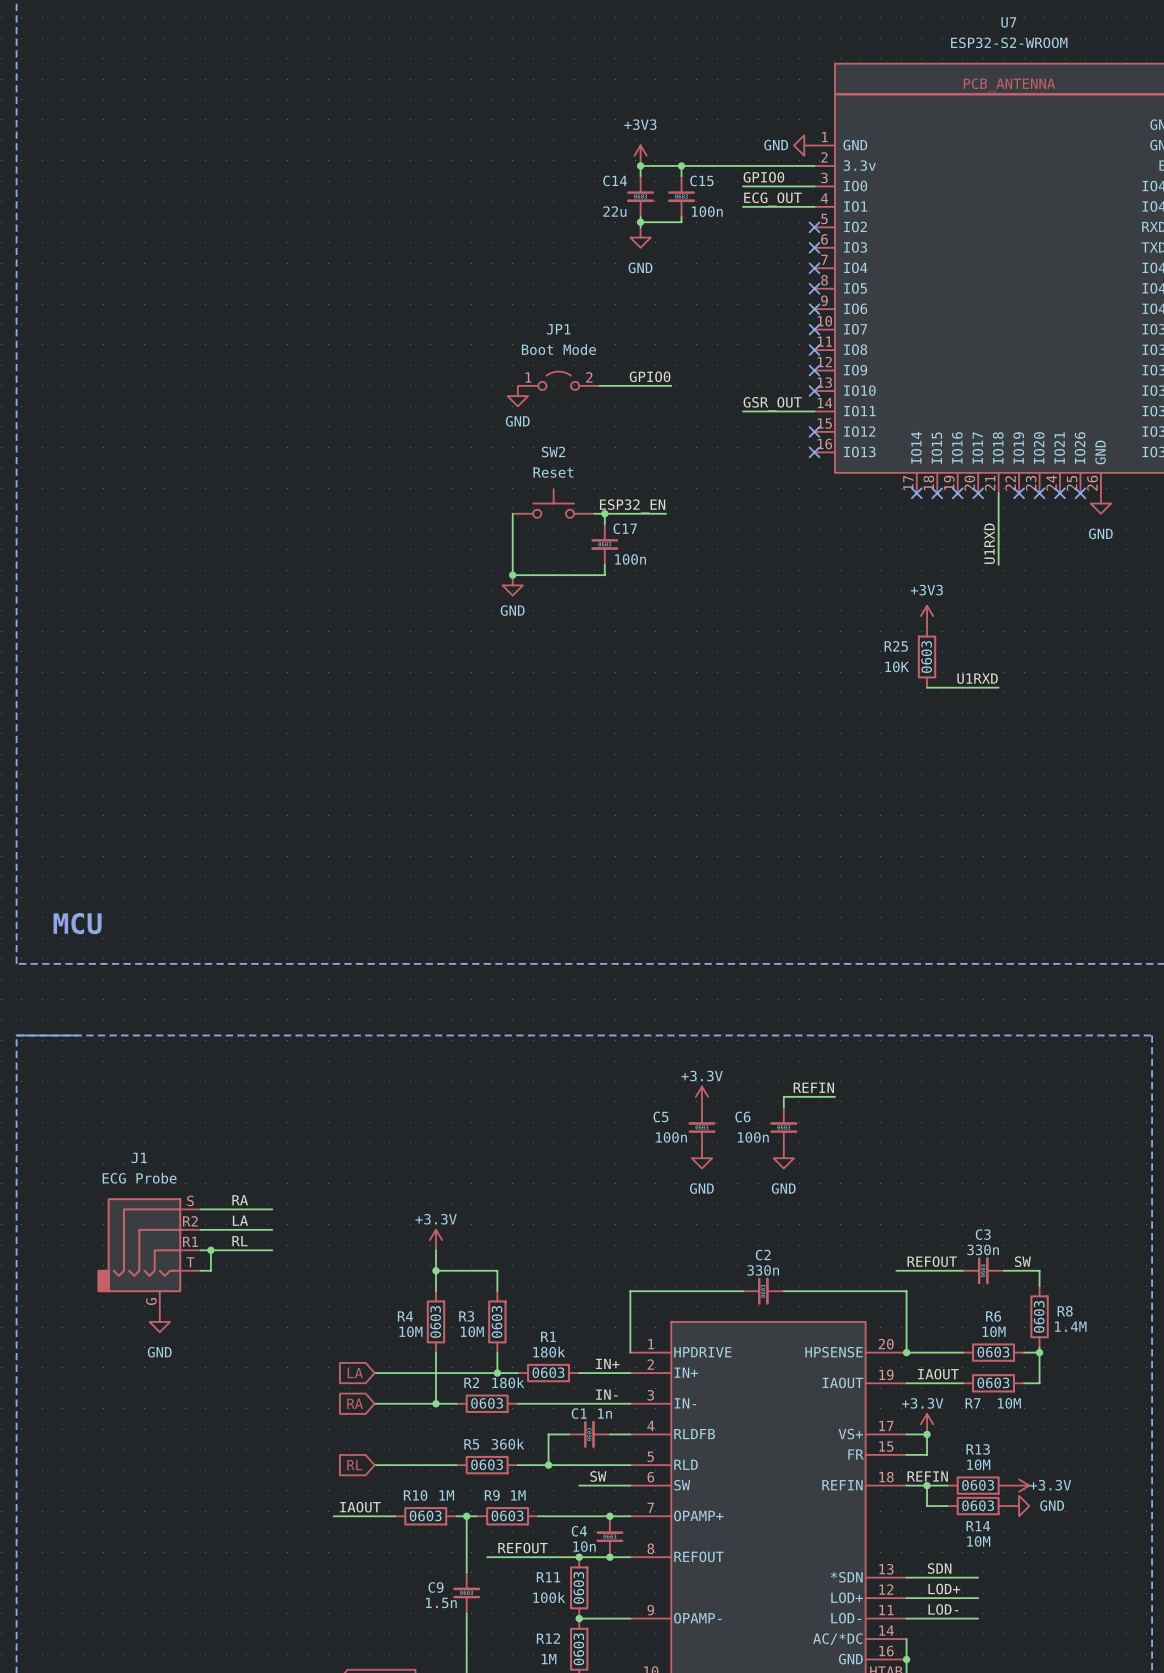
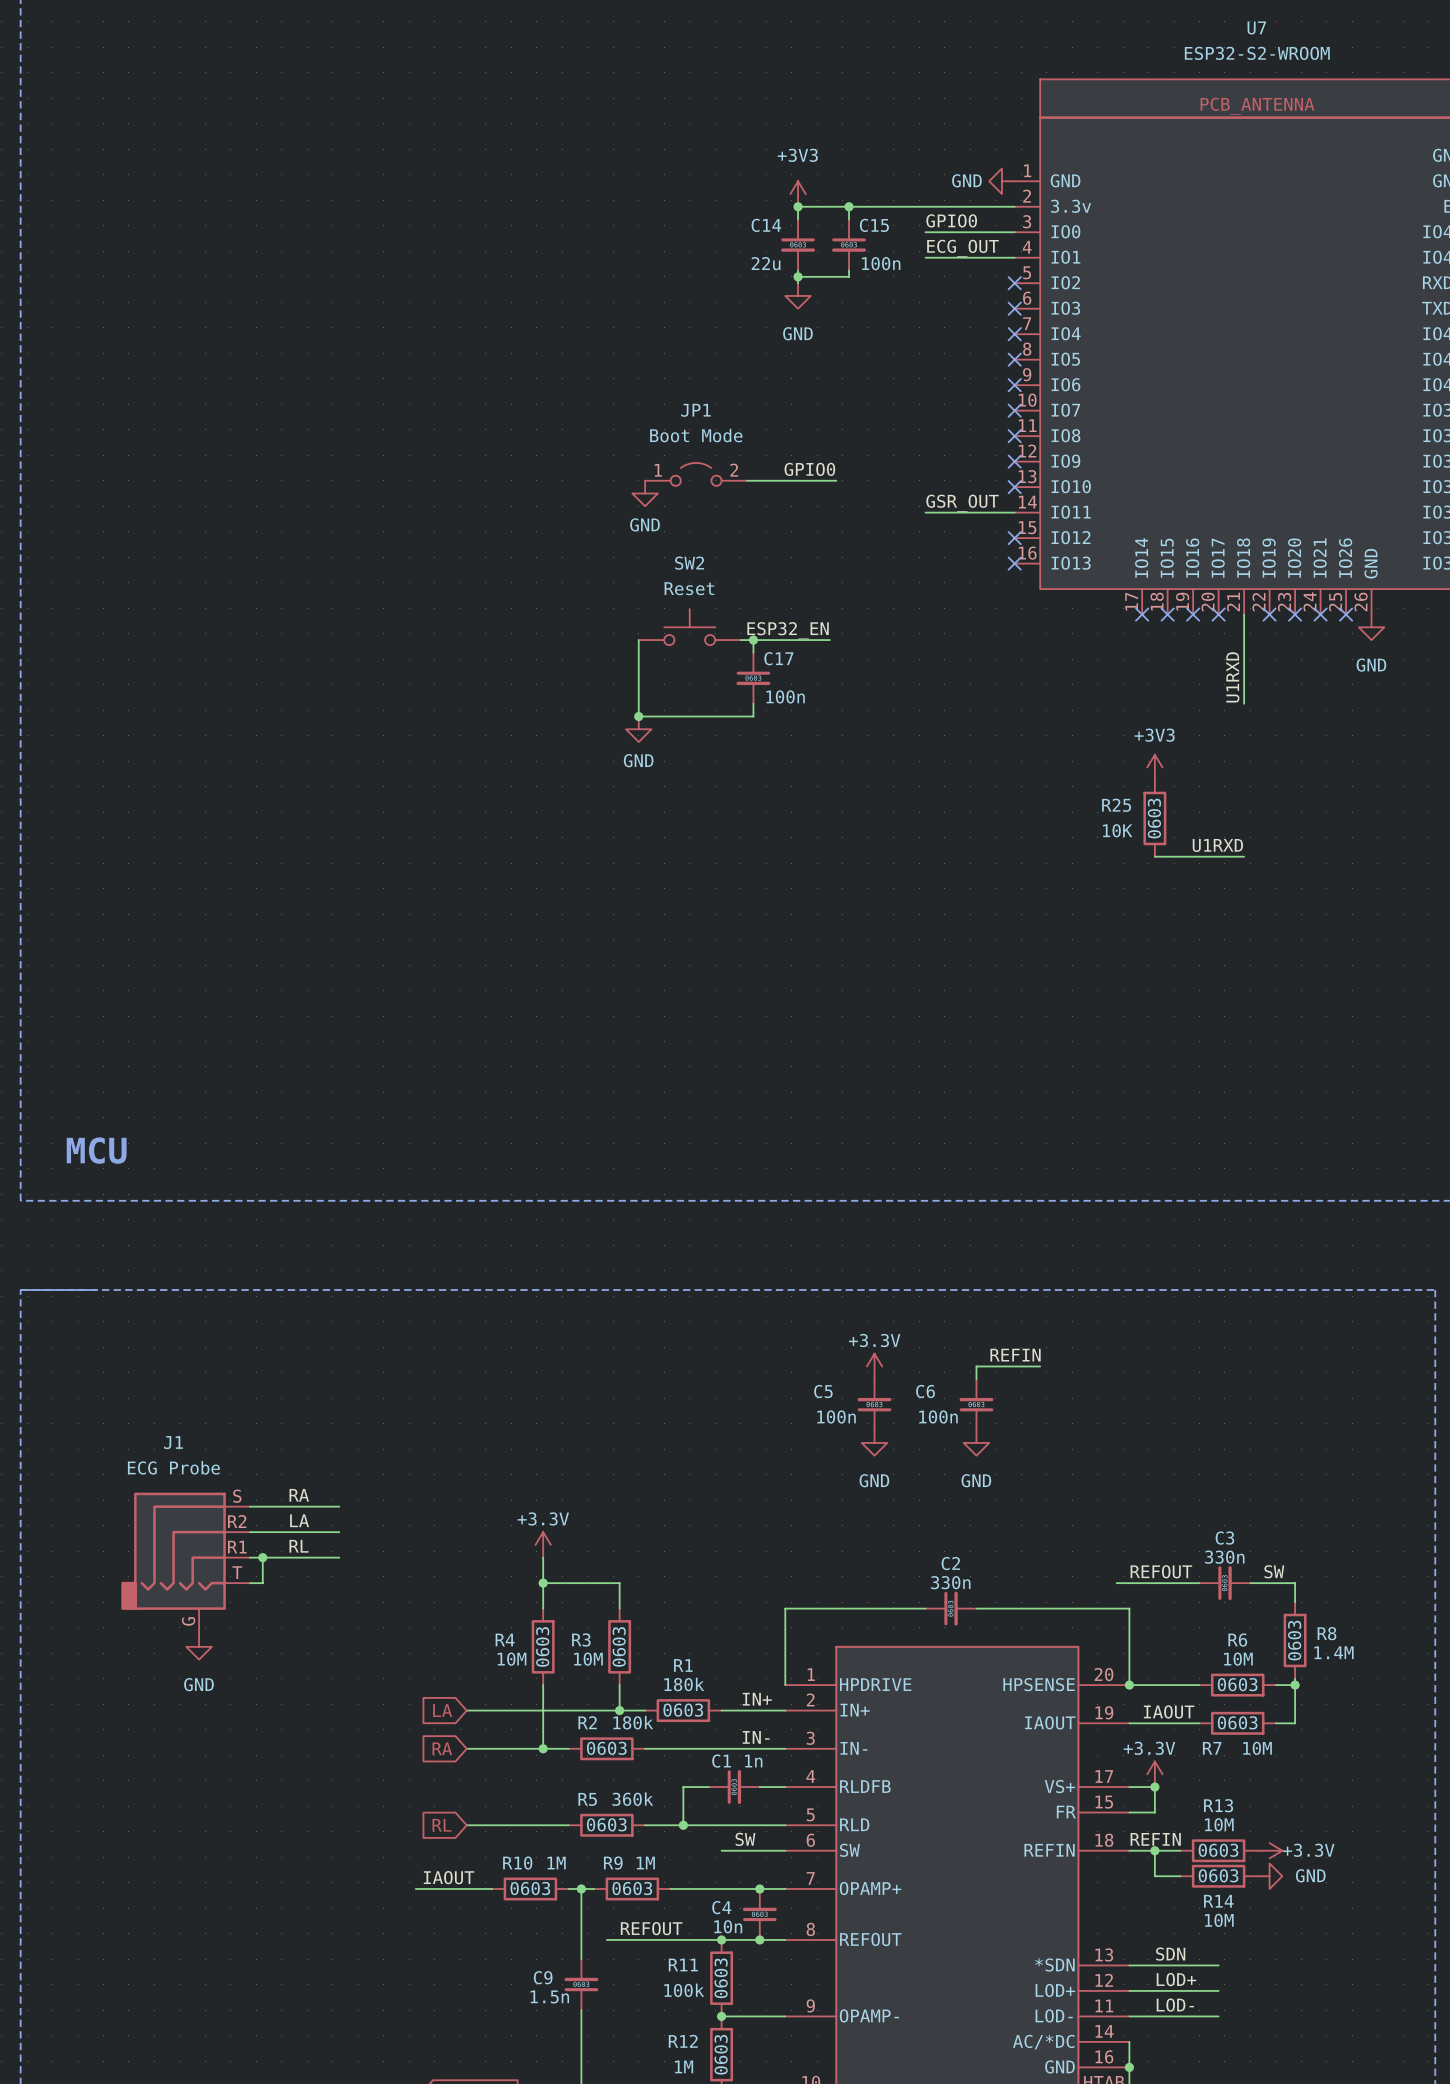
label position: REFIN (813, 1087) -> REFIN (1015, 1355)

